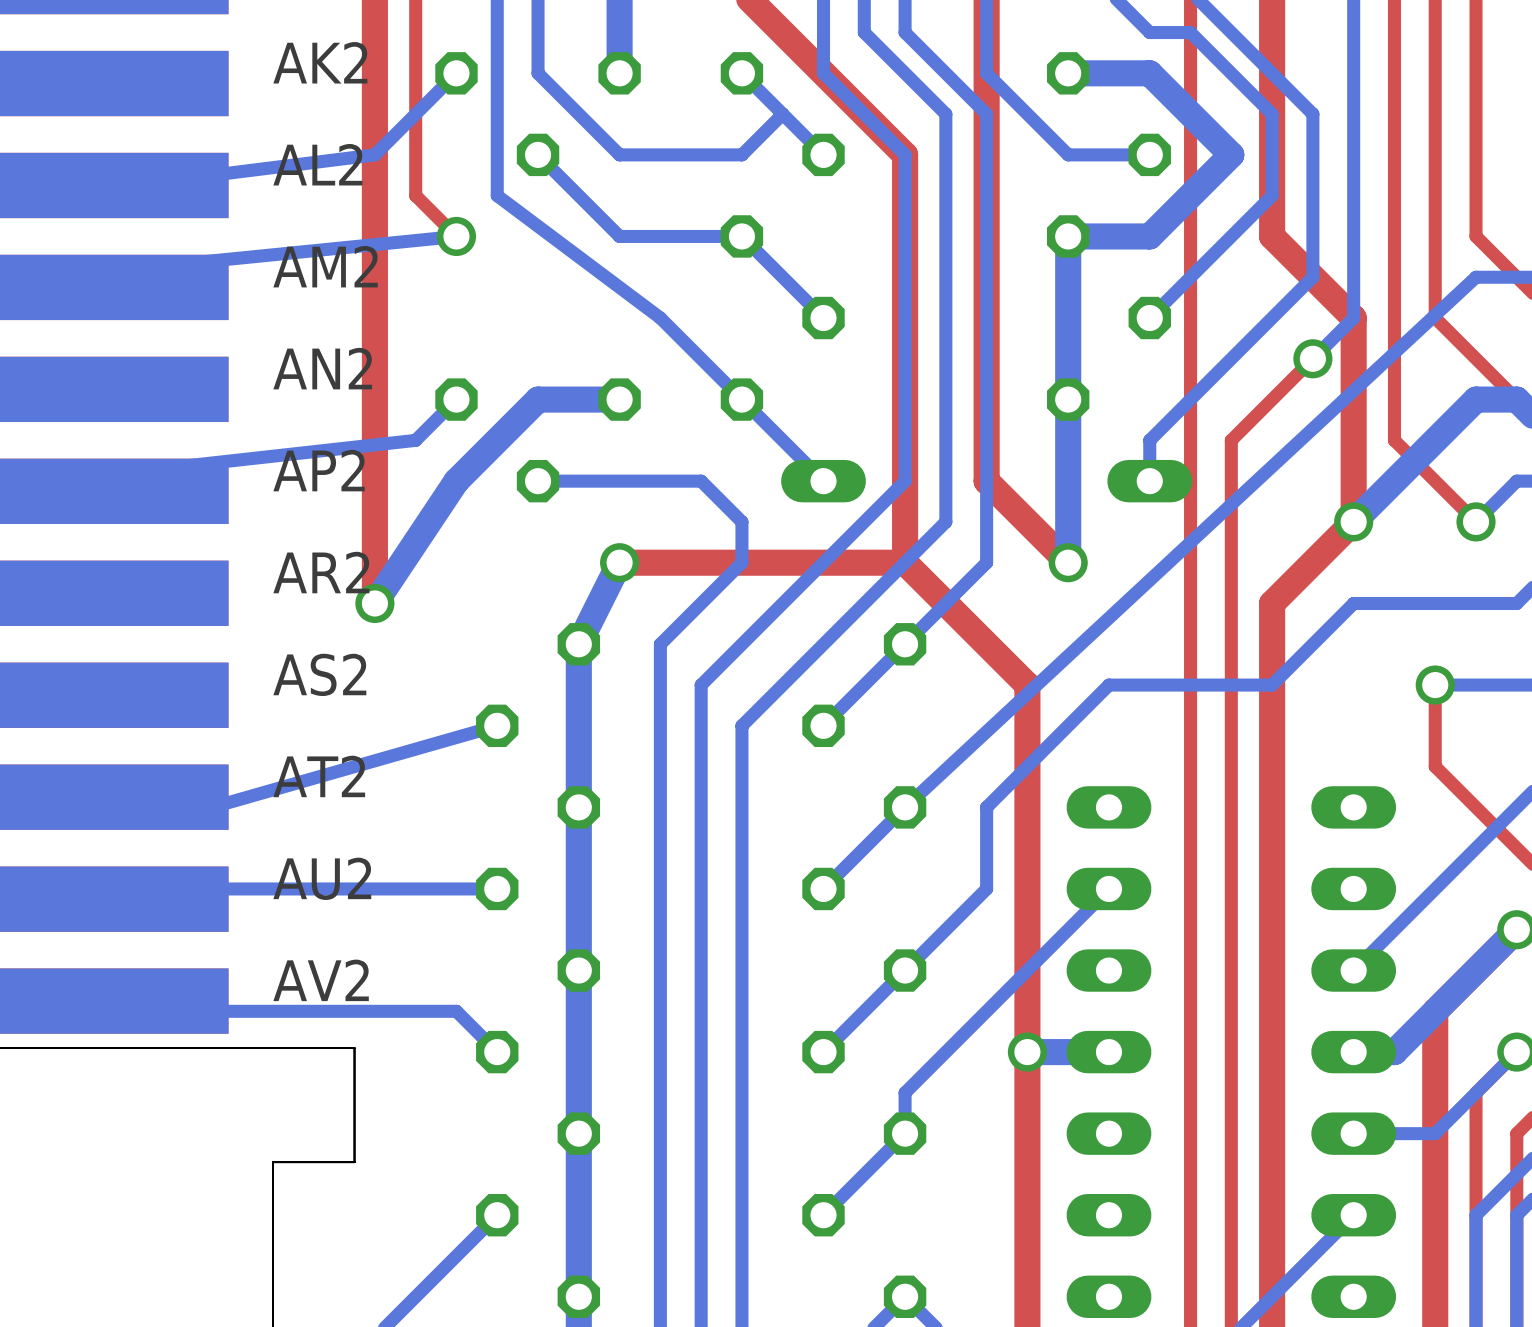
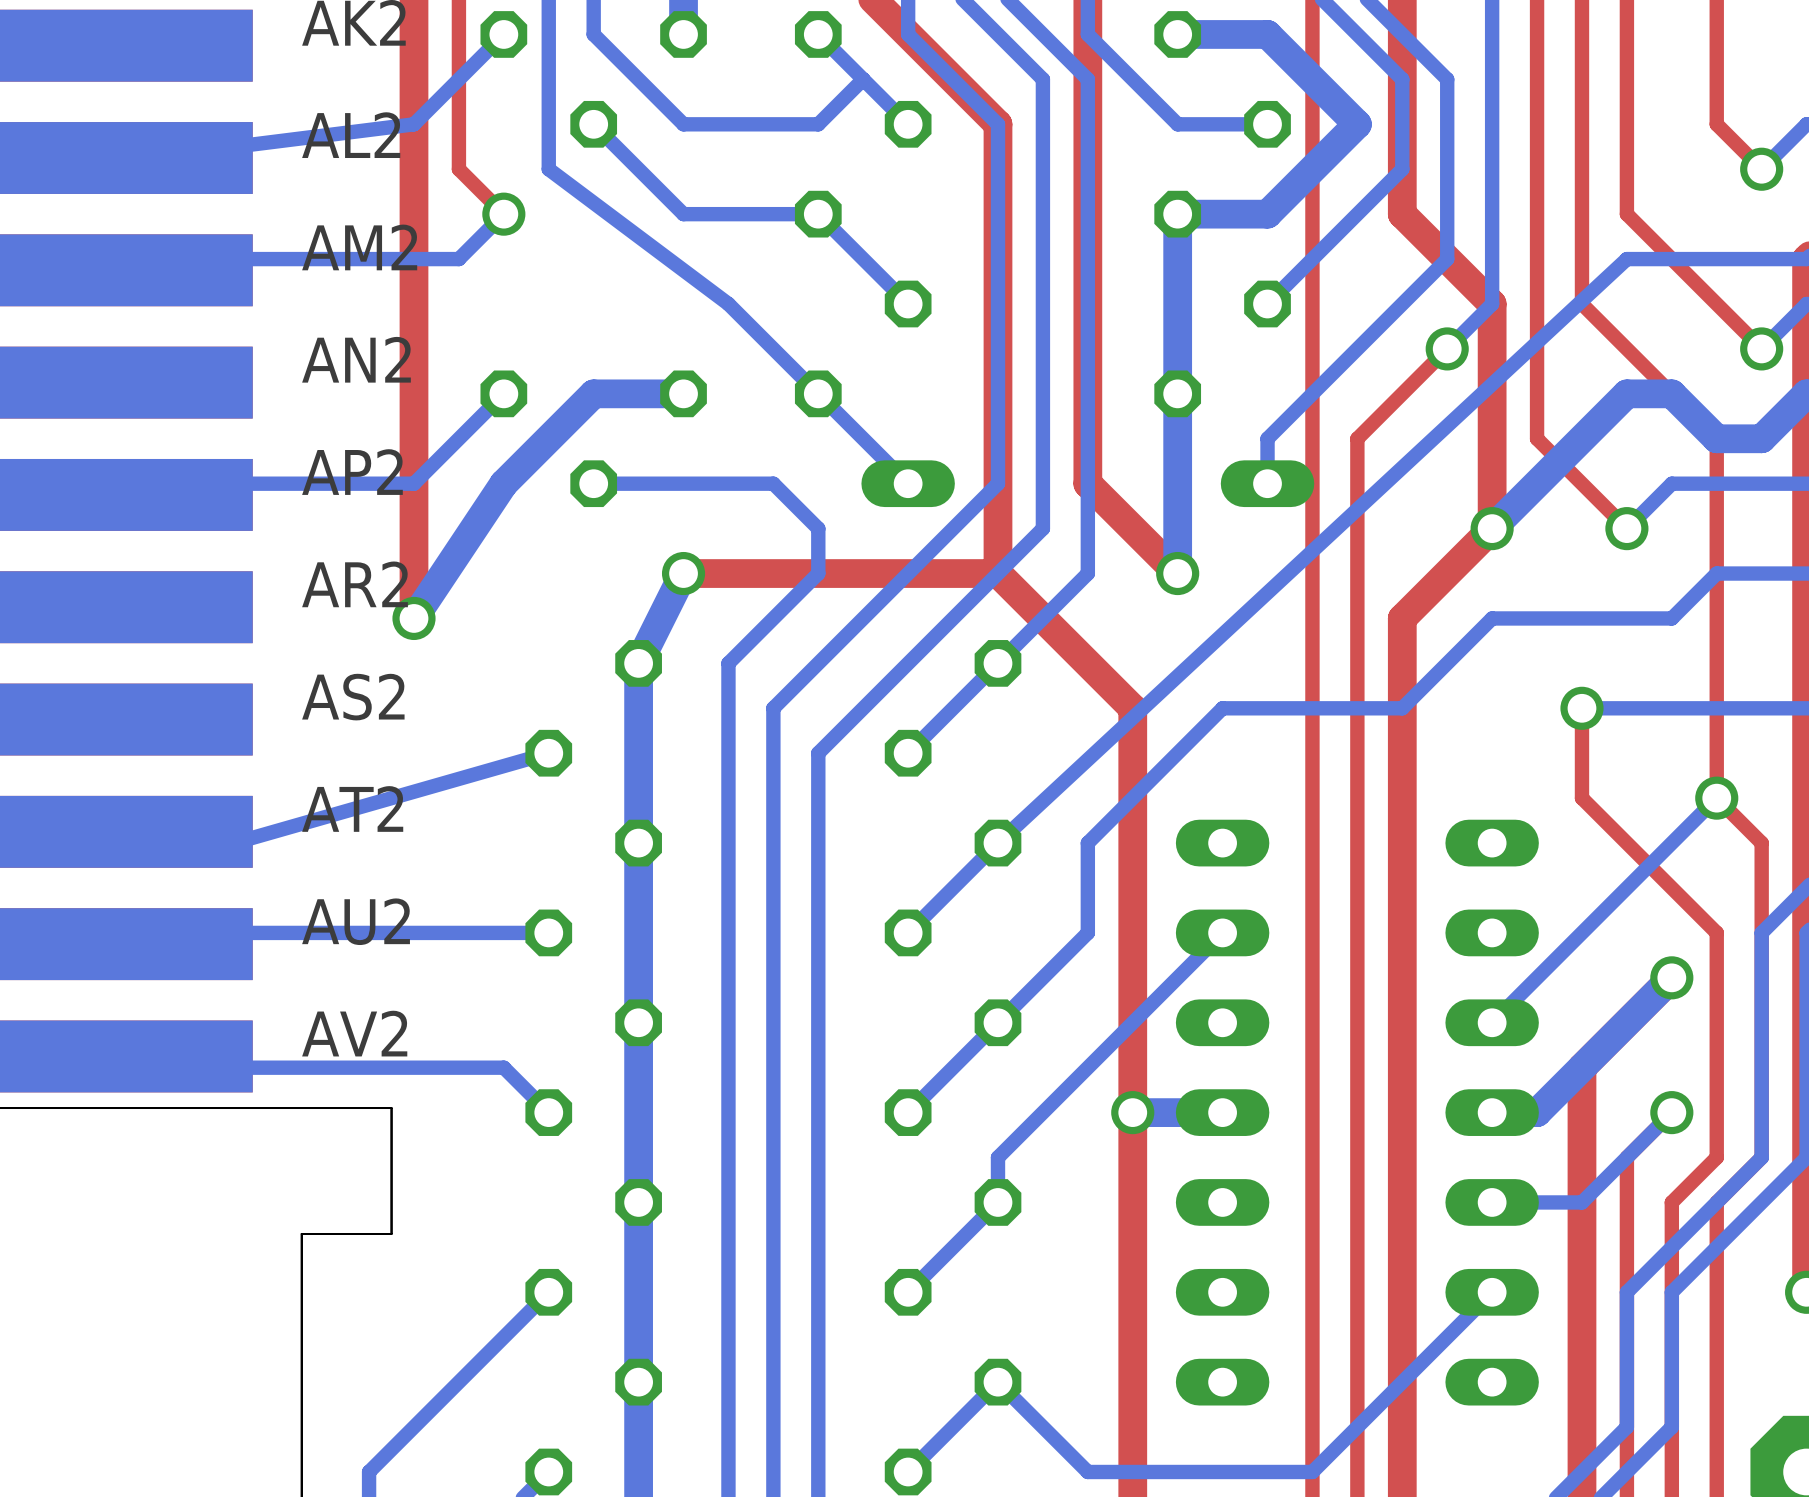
bottom track: (456, 236) (48, 277) -> (503, 214) (458, 259) (54, 259)
bottom track: (415, 440) (48, 481) -> (458, 438) (413, 483) (54, 483)

